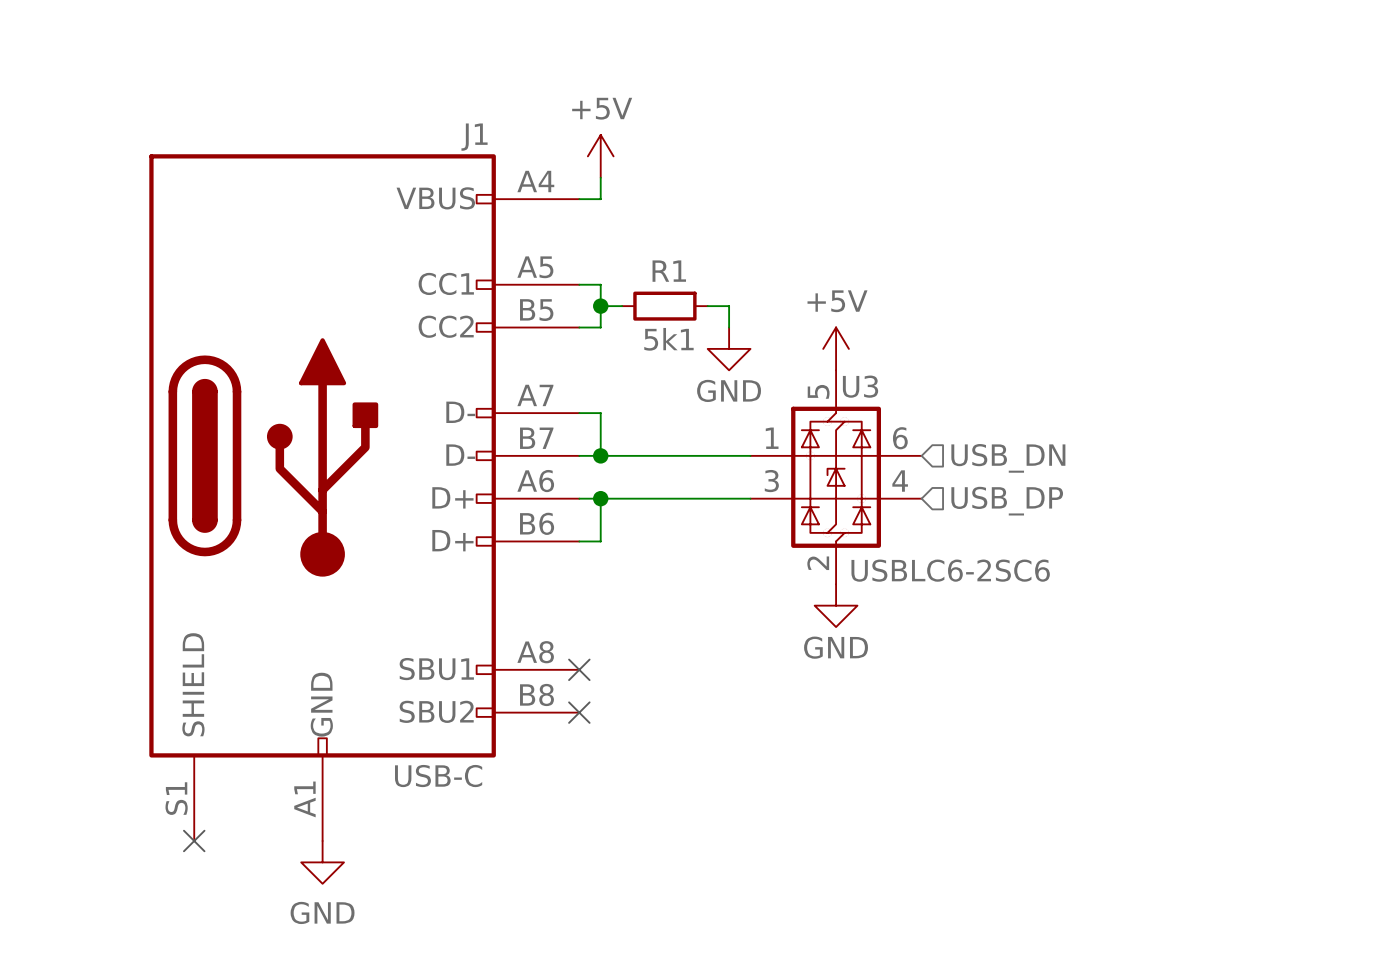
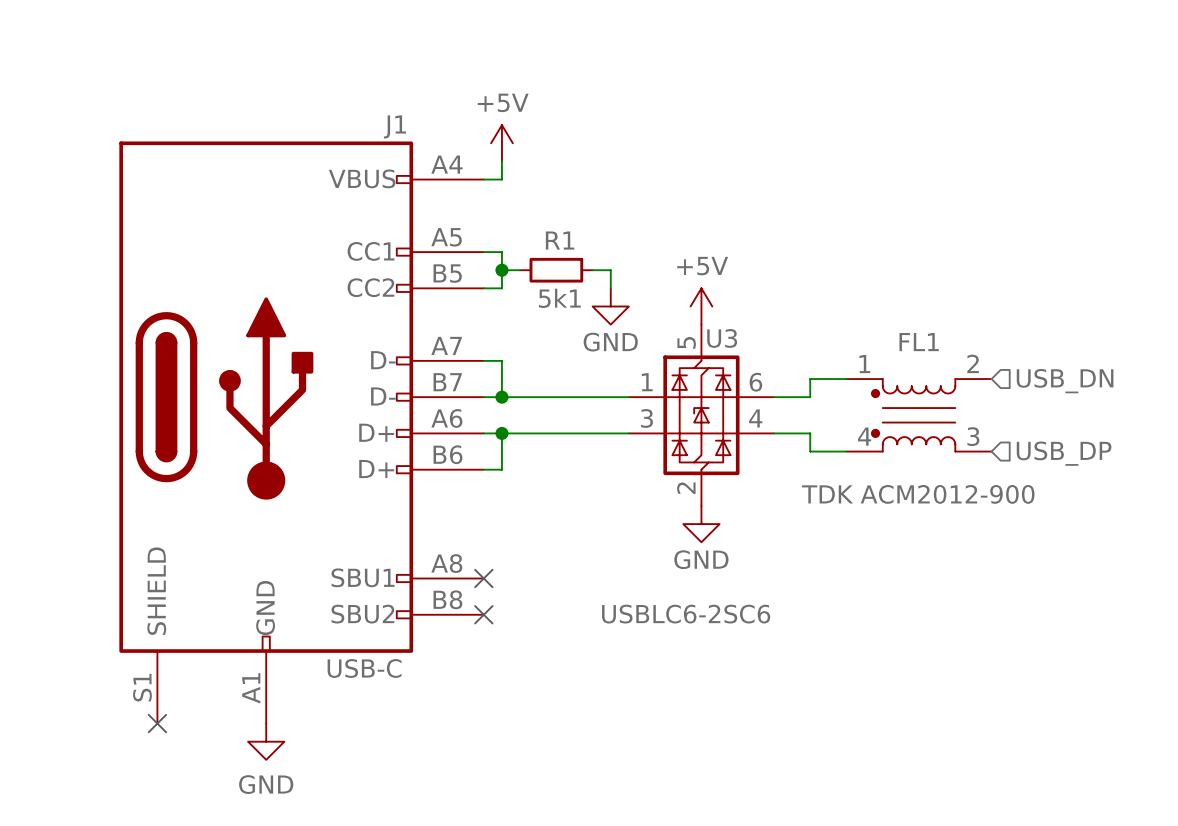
wire: none -> (846, 379) (810, 379) (810, 397) (773, 397)
hierarchical label position: USB_DN (1008, 458) -> USB_DN (1065, 381)
FL1: none -> TDK ACM2012-900 (919, 415)
wire: none -> (773, 433) (810, 433) (810, 451) (846, 451)
hierarchical label position: USB_DP (1007, 501) -> USB_DP (1064, 453)
U3 value position: USBLC6-2SC6 (950, 570) -> USBLC6-2SC6 (686, 614)

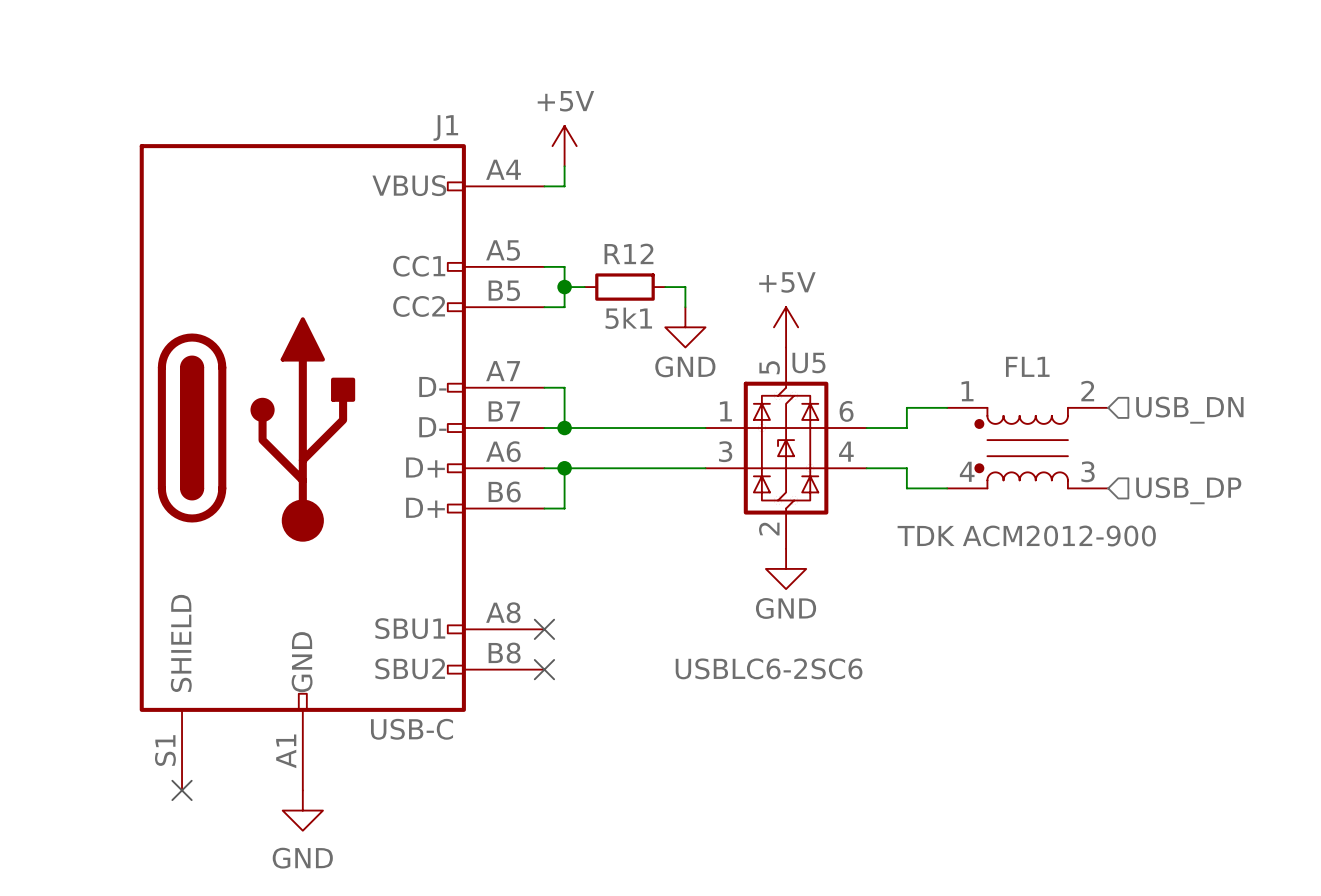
R1 name: R1 (560, 240) -> R12 (628, 253)
U3 name: U3 (722, 338) -> U5 (808, 363)

